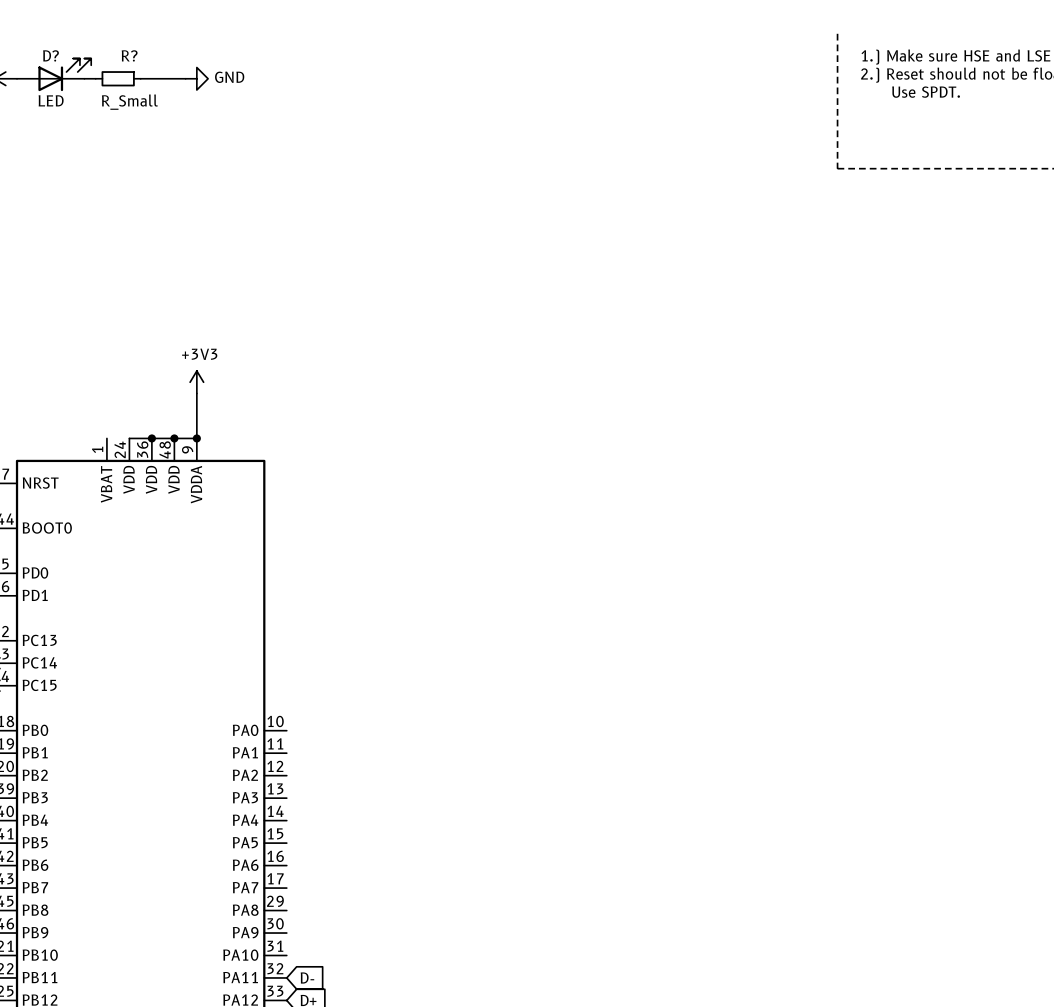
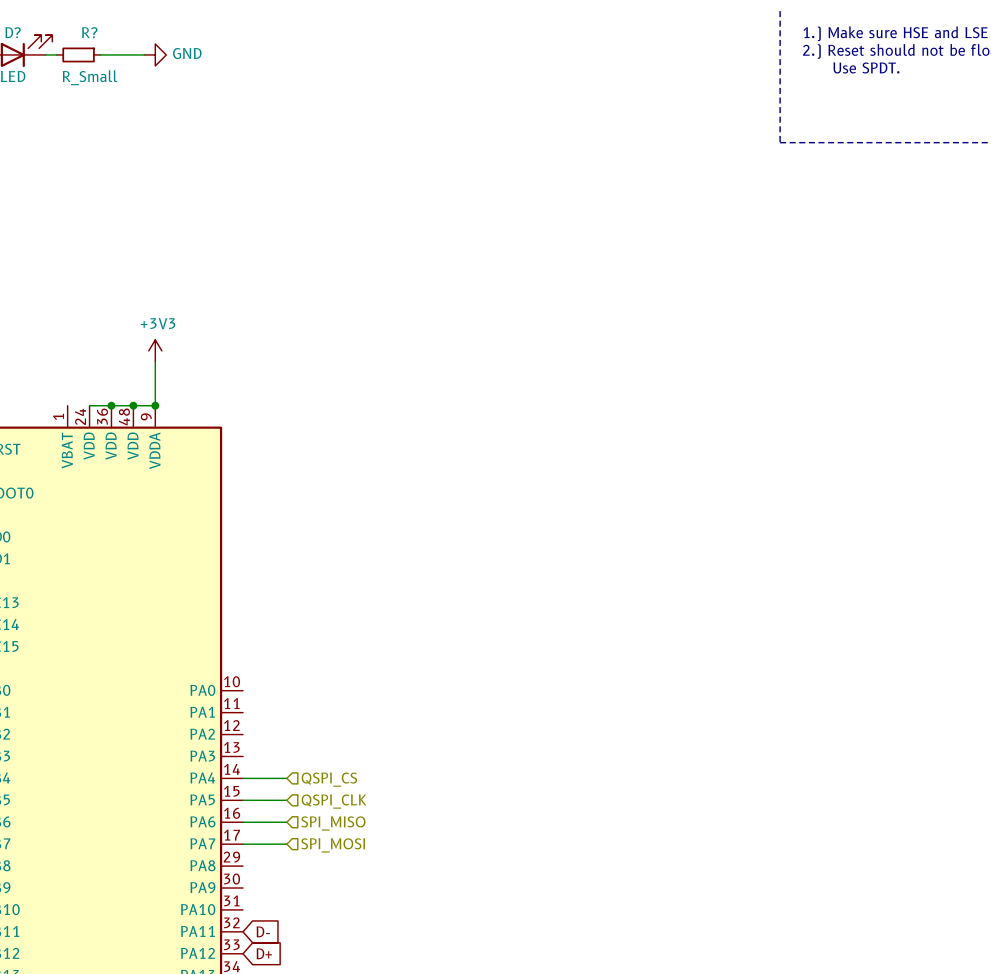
wire: none -> (243, 778) (286, 778)
hierarchical label: none -> QSPI_CS (329, 779)
wire: none -> (243, 800) (286, 800)
hierarchical label: none -> QSPI_CLK (333, 801)
wire: none -> (243, 822) (286, 822)
hierarchical label: none -> SPI_MISO (333, 823)
wire: none -> (243, 844) (286, 844)
hierarchical label: none -> SPI_MOSI (333, 845)

